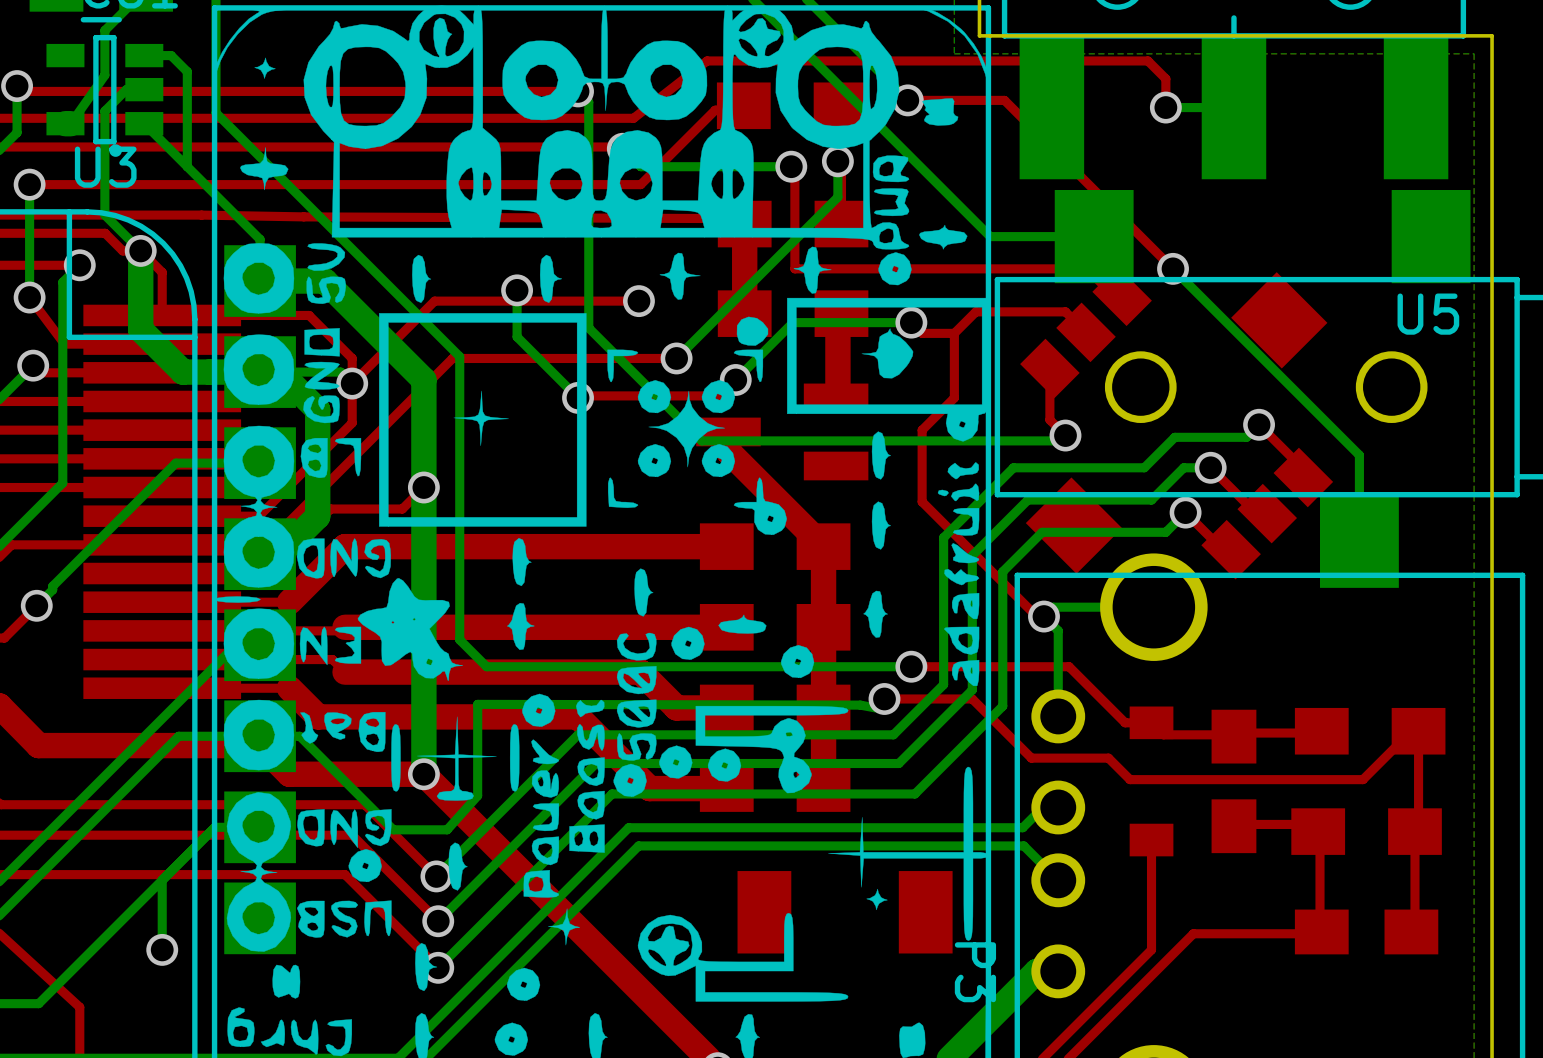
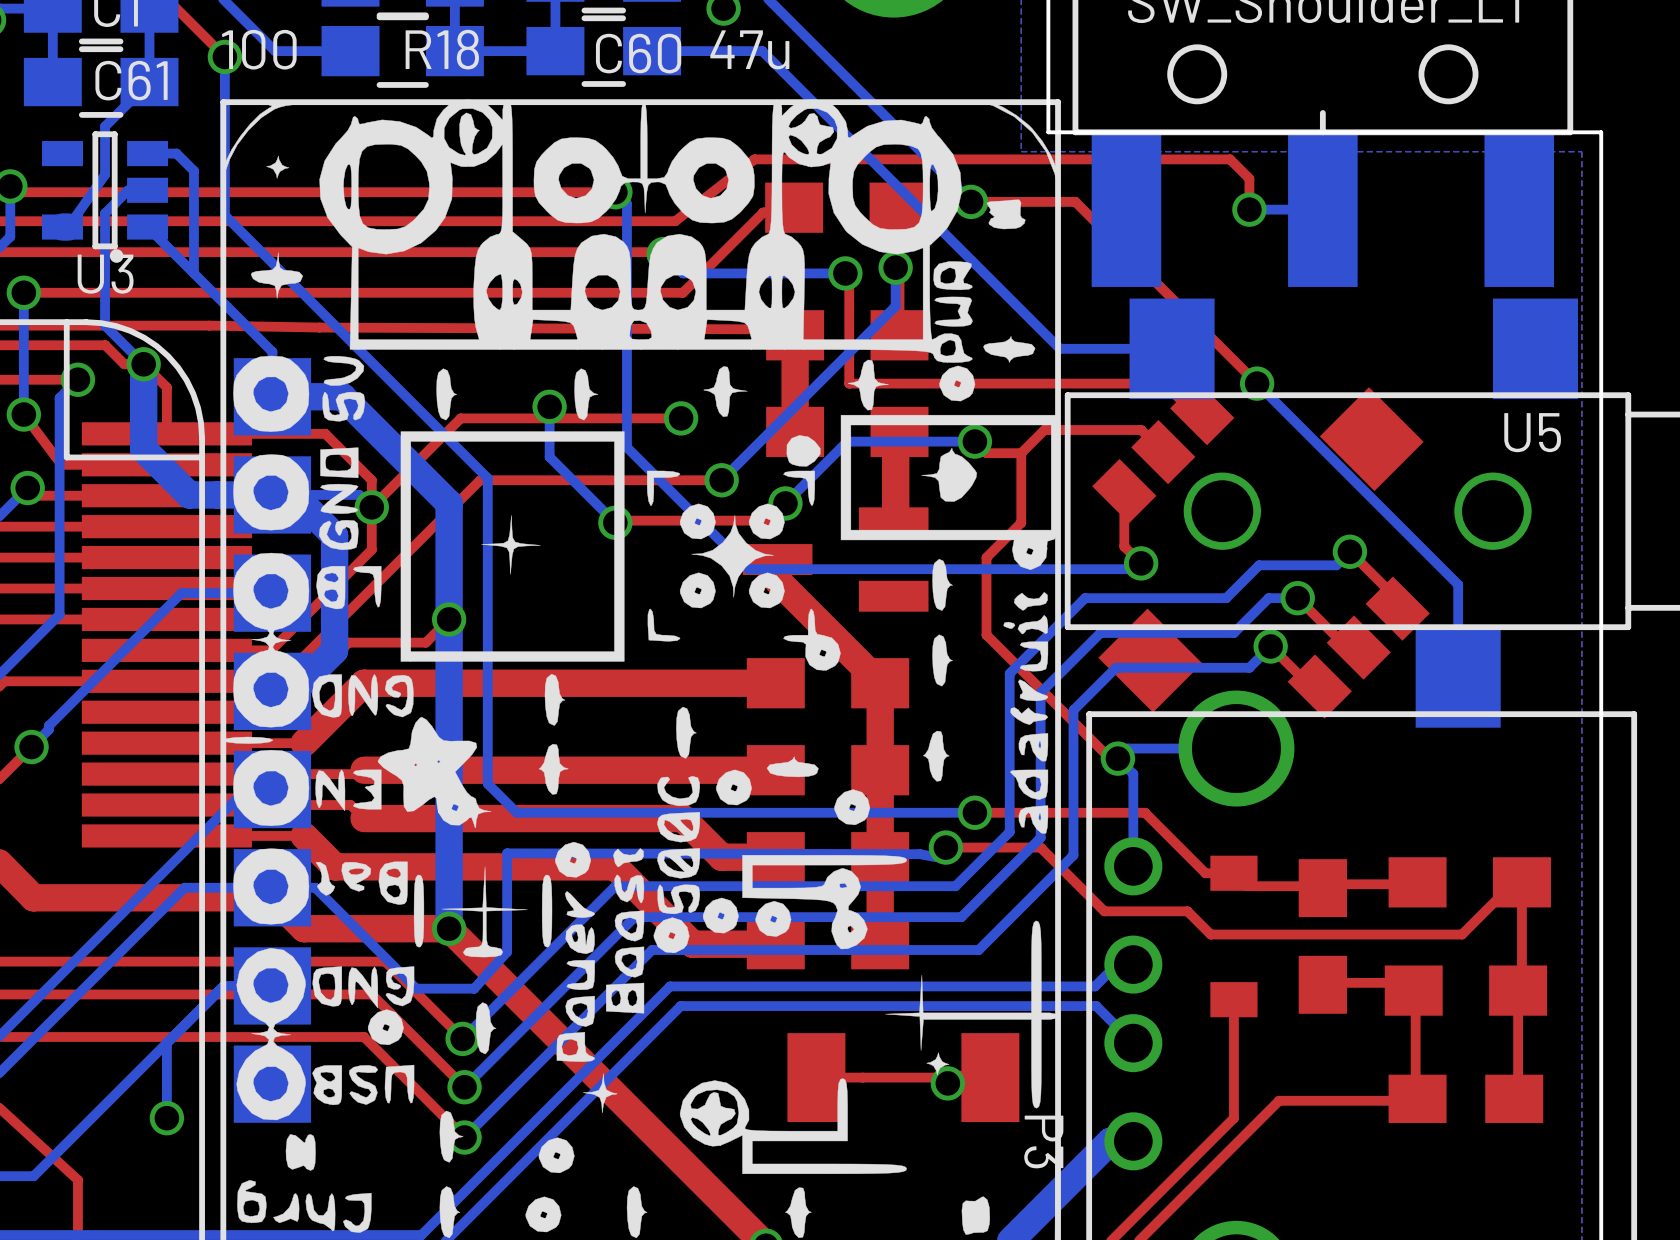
top track: none -> (990, 1077) (986, 1075) (955, 1075) (947, 1083) (942, 1077) (816, 1077)
via: none -> (947, 1083)

